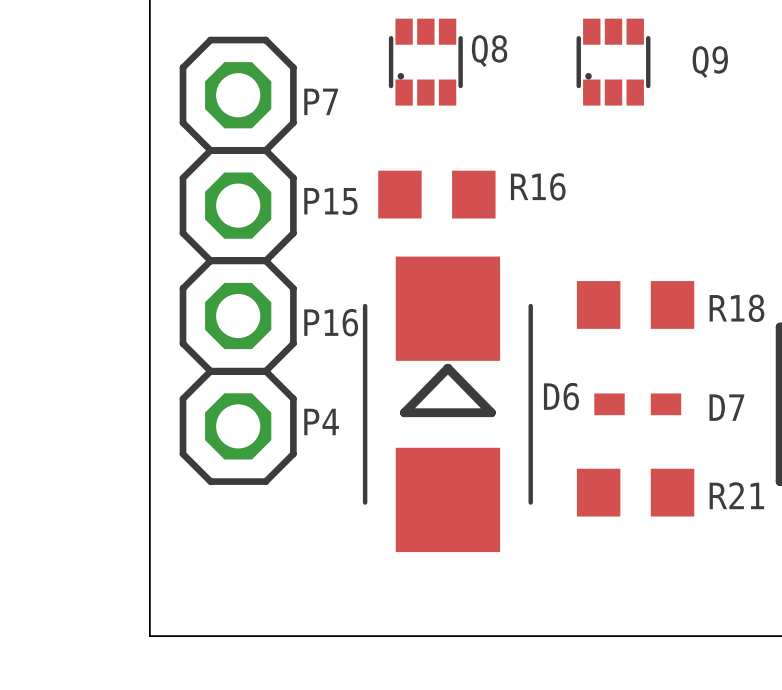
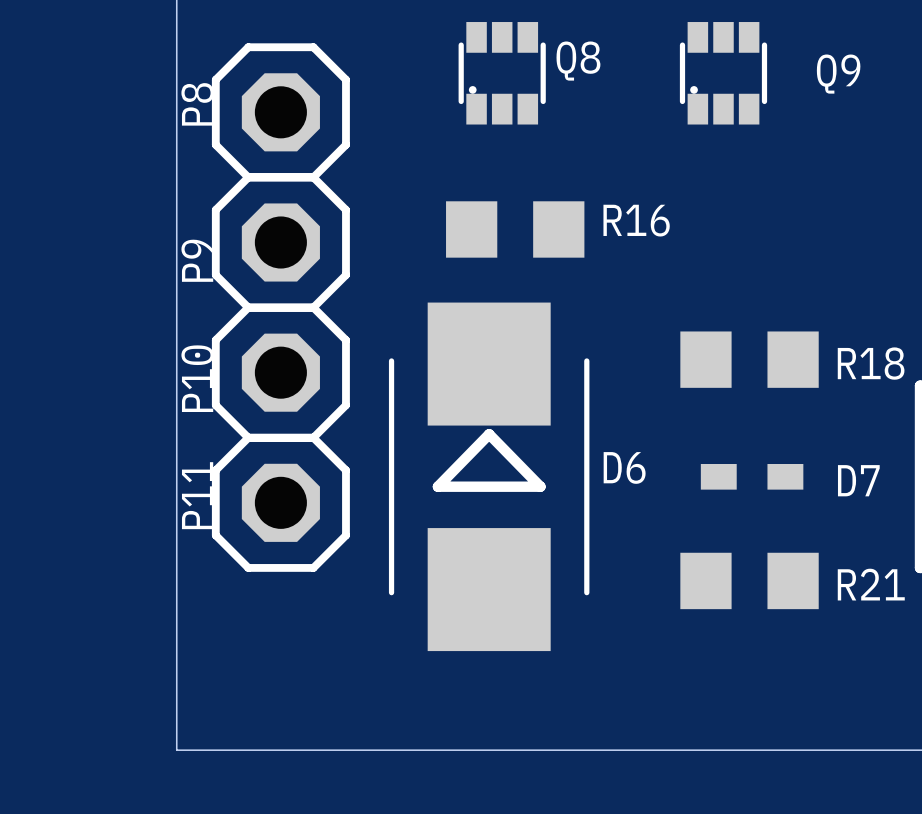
P7 name: P7 (321, 101) -> P8 (197, 104)
P15 name: P15 (330, 201) -> P9 (197, 260)
P16 name: P16 (331, 322) -> P10 (197, 378)
D6 position: (447, 404) -> (489, 476)
P4 name: P4 (321, 421) -> P11 (197, 495)

